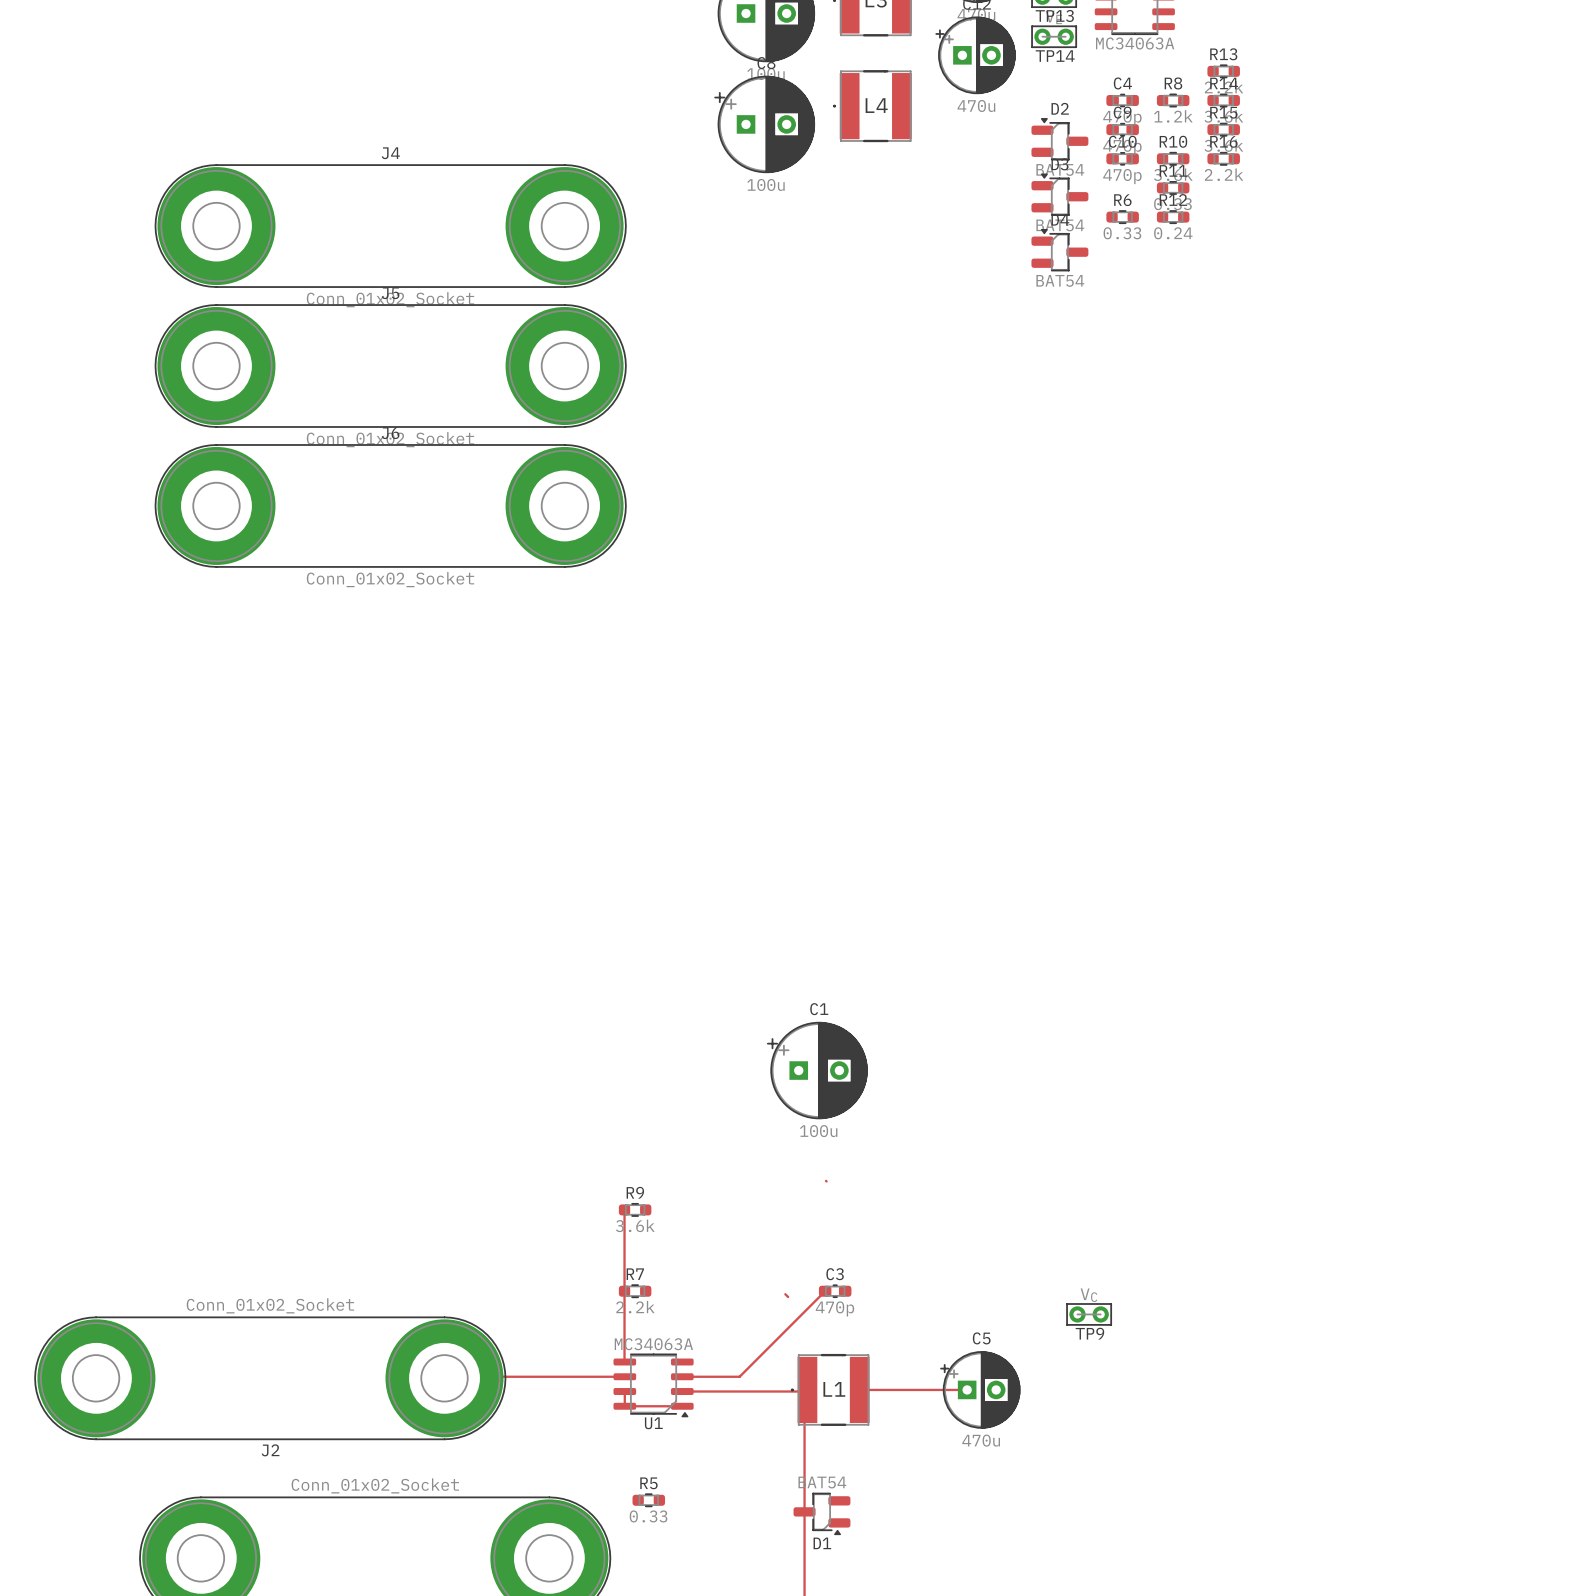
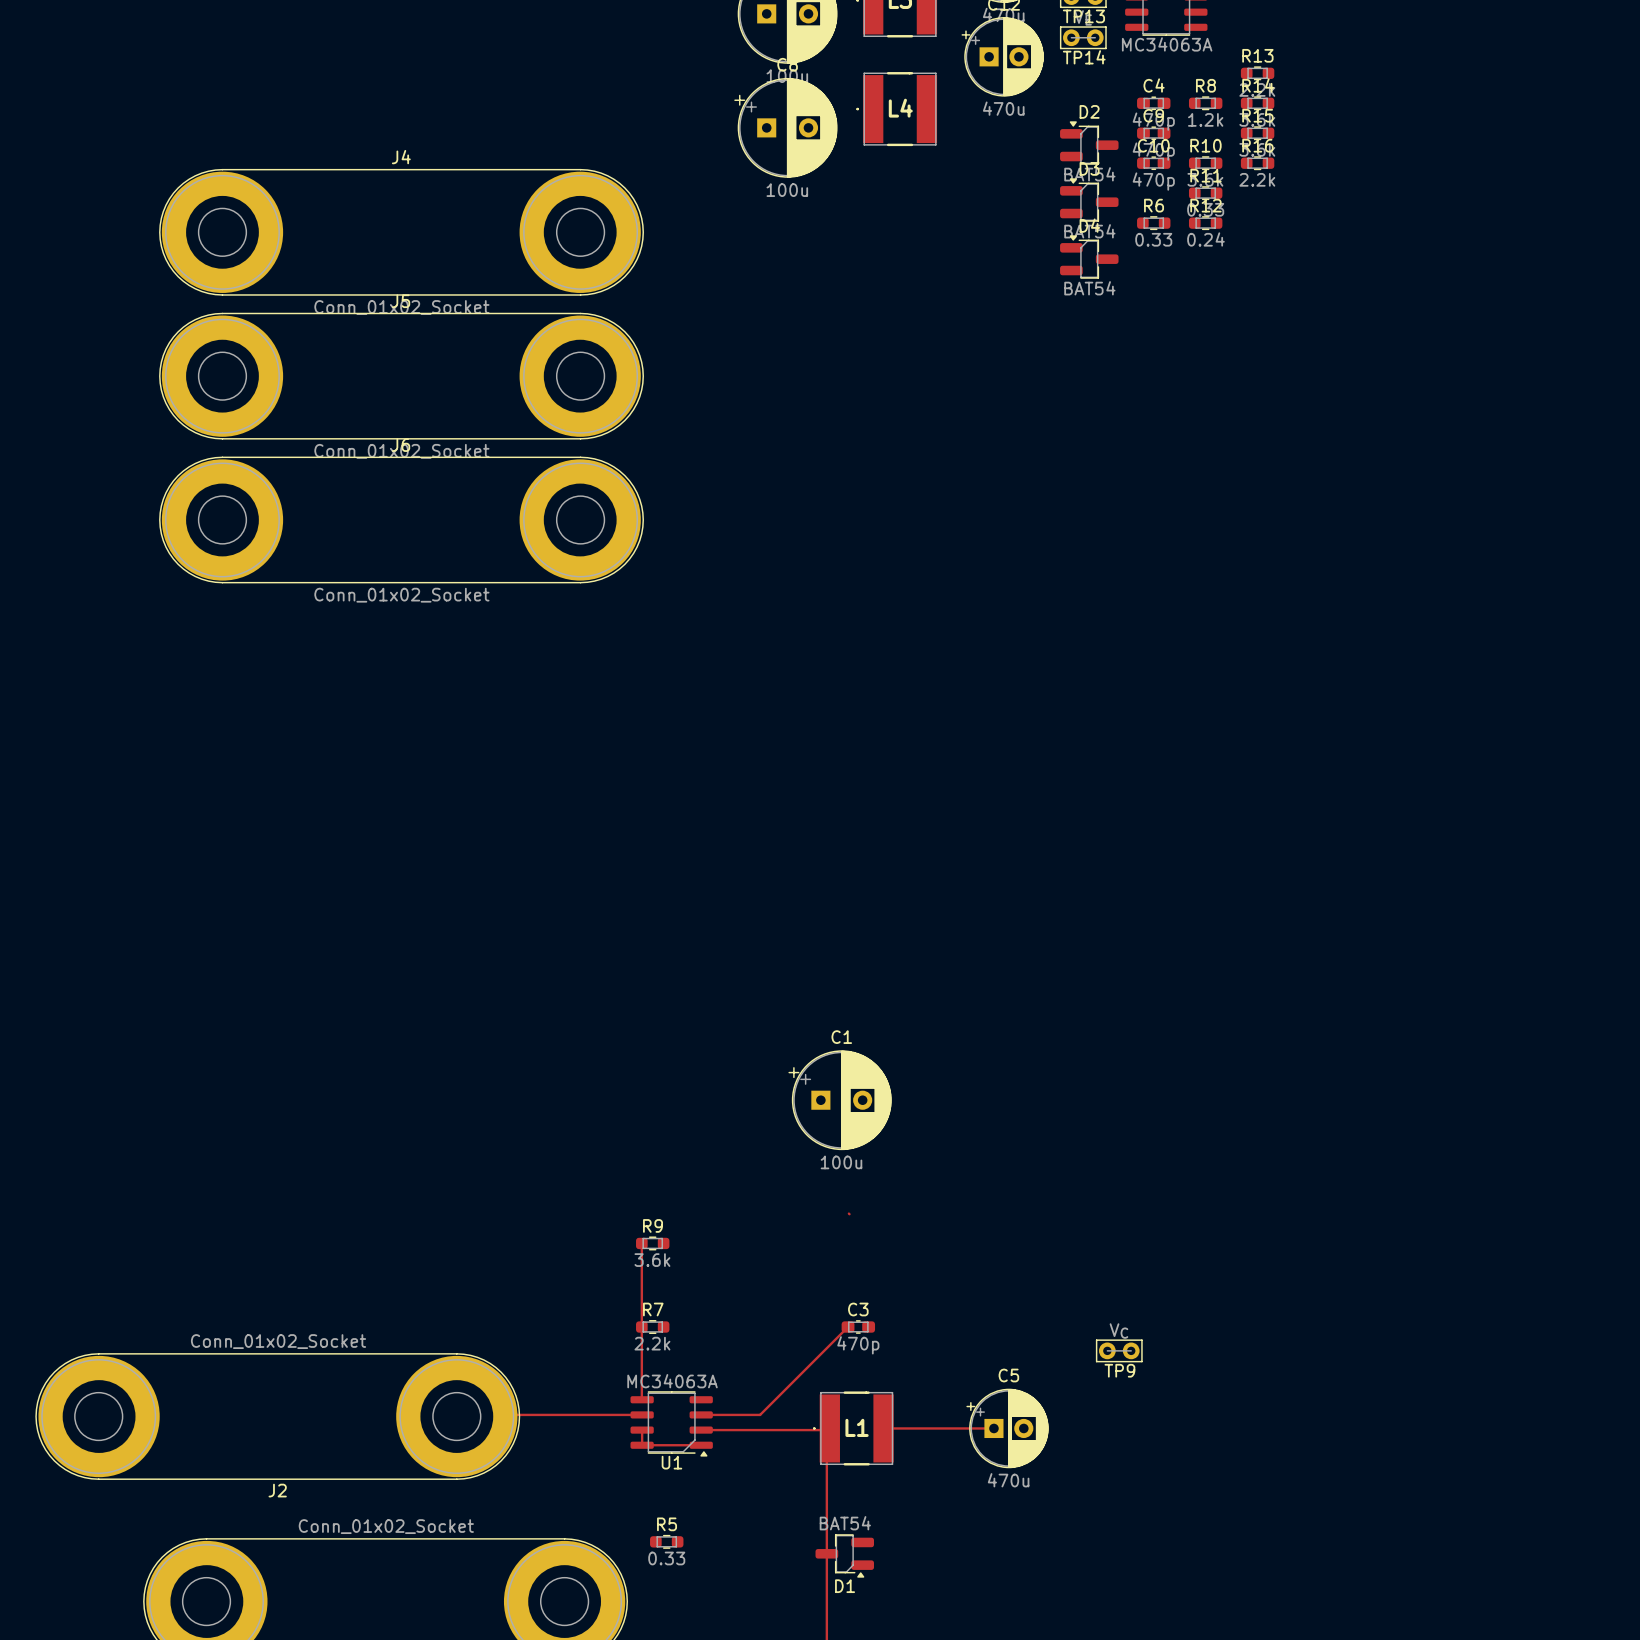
top track: (785, 1294) (788, 1297) -> none

